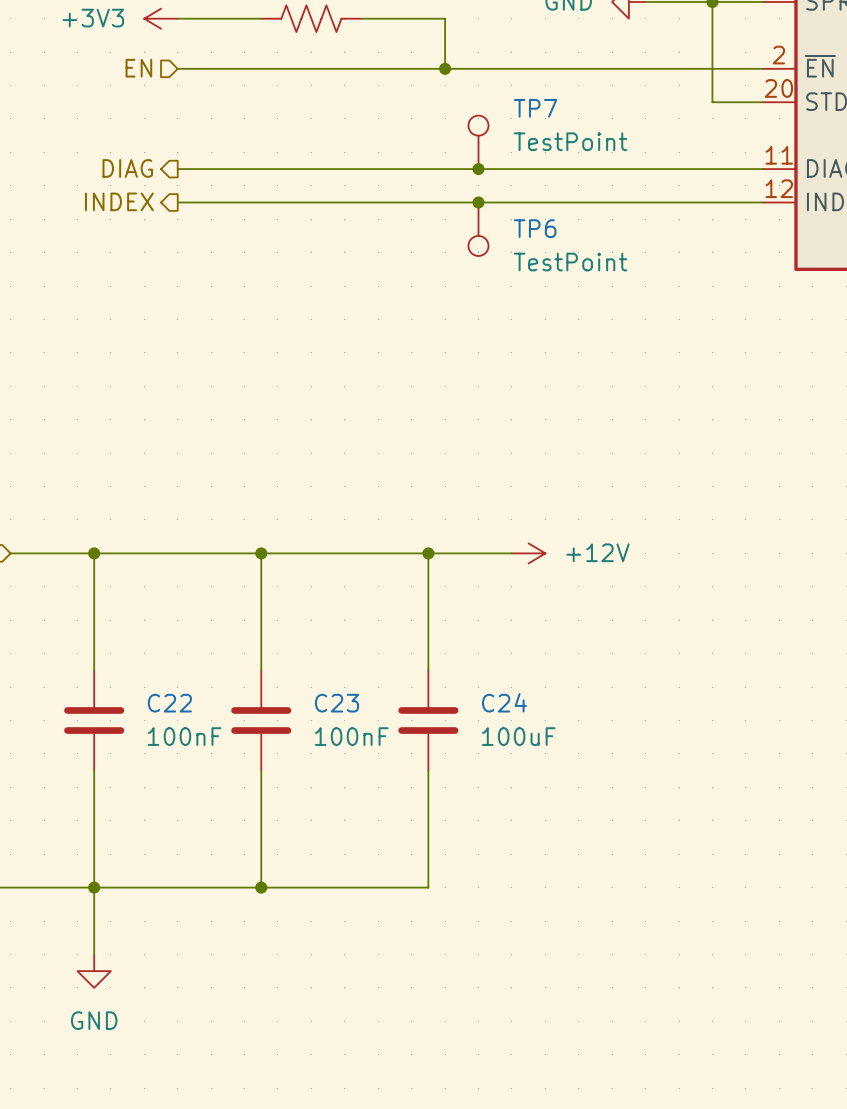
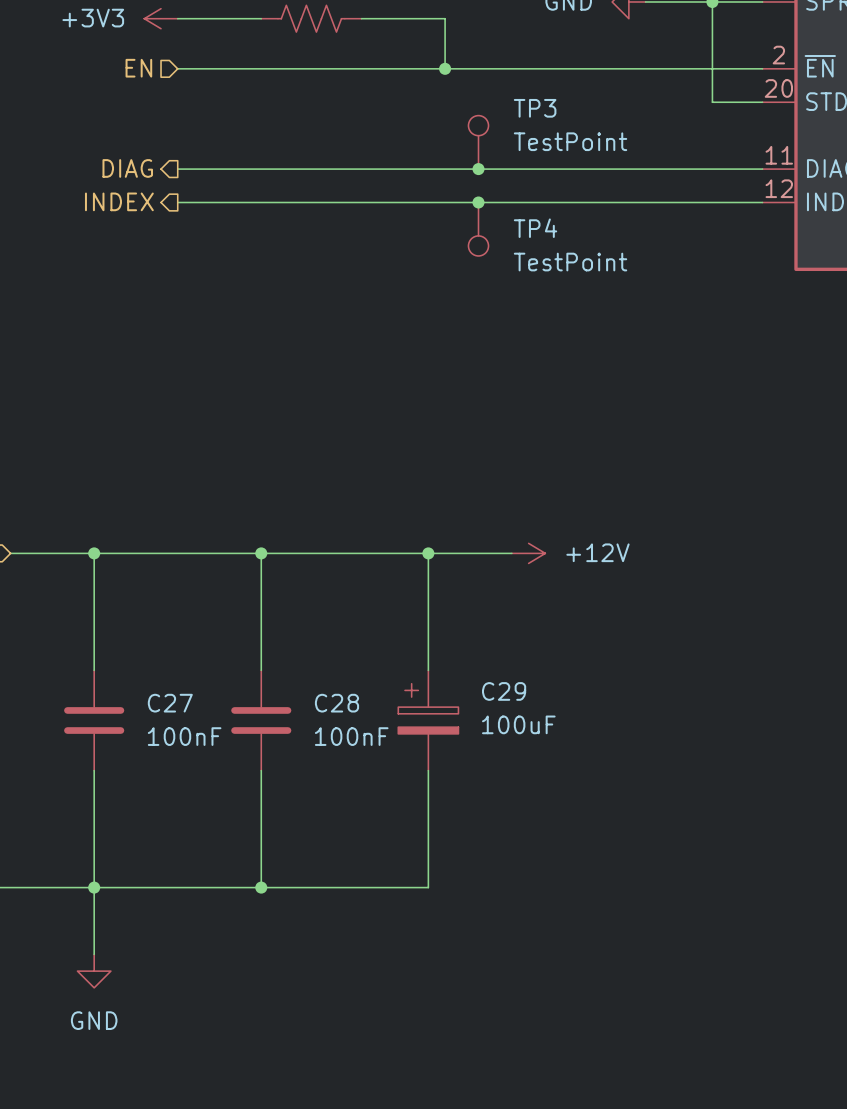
TP7 name: TP7 (535, 108) -> TP3 (535, 108)
TP6 name: TP6 (535, 228) -> TP4 (535, 228)
C22 name: C22 (169, 703) -> C27 (170, 703)
C23 name: C23 (336, 703) -> C28 (336, 703)
C24: 100uF (428, 720) -> none
C29: none -> 100uF (428, 720)

